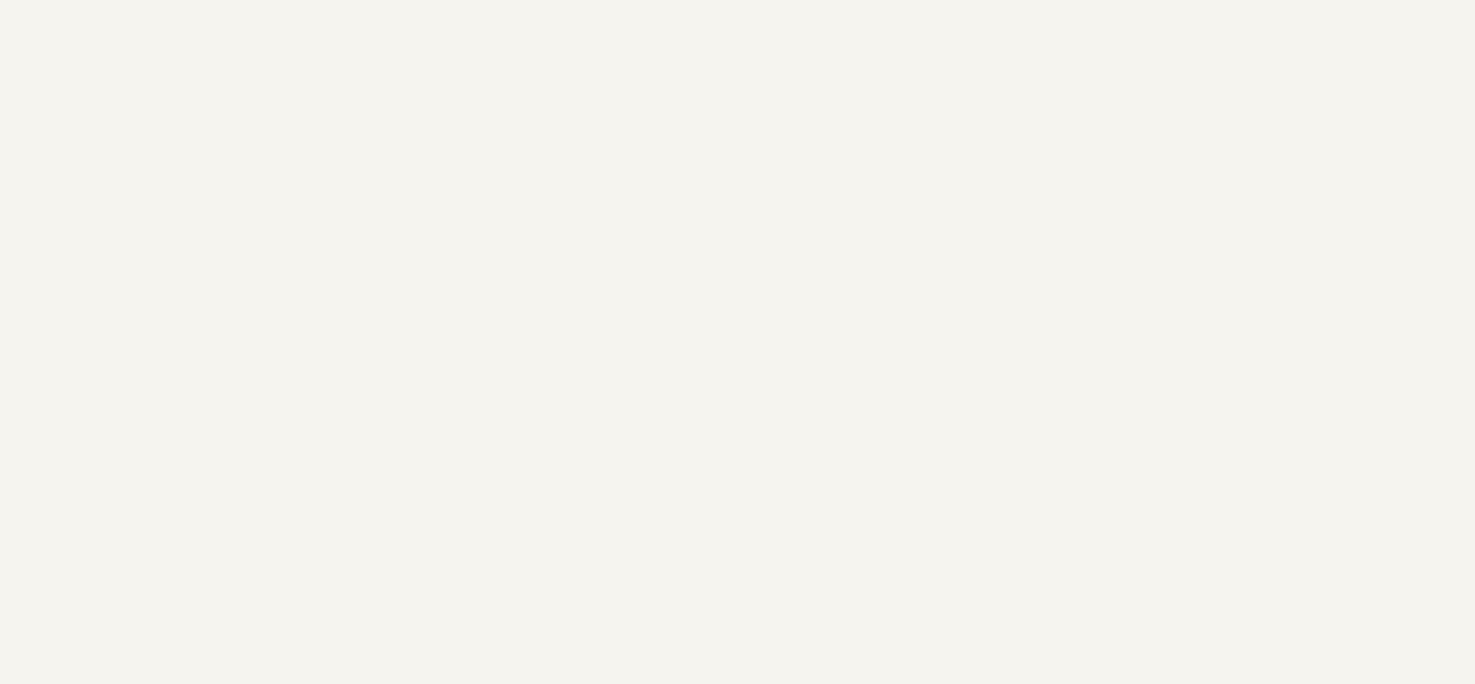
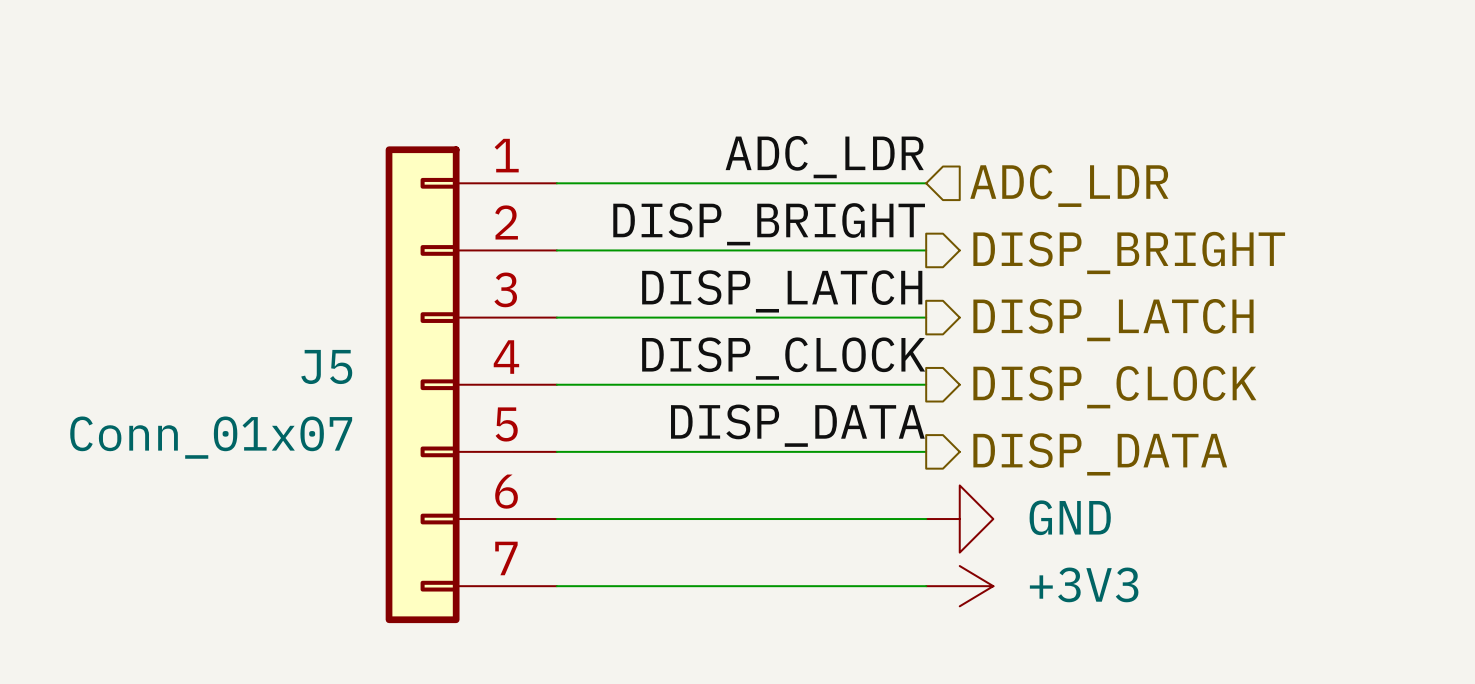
label: none -> ADC_LDR (824, 157)
wire: none -> (556, 183) (926, 183)
hierarchical label: none -> ADC_LDR (1069, 185)
label: none -> DISP_BRIGHT (769, 224)
wire: none -> (556, 250) (926, 250)
hierarchical label: none -> DISP_BRIGHT (1129, 252)
label: none -> DISP_LATCH (782, 291)
wire: none -> (556, 317) (926, 317)
hierarchical label: none -> DISP_LATCH (1113, 320)
label: none -> DISP_CLOCK (783, 358)
J5: none -> Conn_01x07 (471, 384)
wire: none -> (556, 384) (926, 384)
hierarchical label: none -> DISP_CLOCK (1114, 387)
label: none -> DISP_DATA (797, 425)
wire: none -> (556, 451) (926, 451)
hierarchical label: none -> DISP_DATA (1100, 454)
wire: none -> (556, 519) (926, 519)
power symbol: none -> GND (959, 519)
wire: none -> (556, 586) (926, 586)
power symbol: none -> +3V3 (959, 586)

